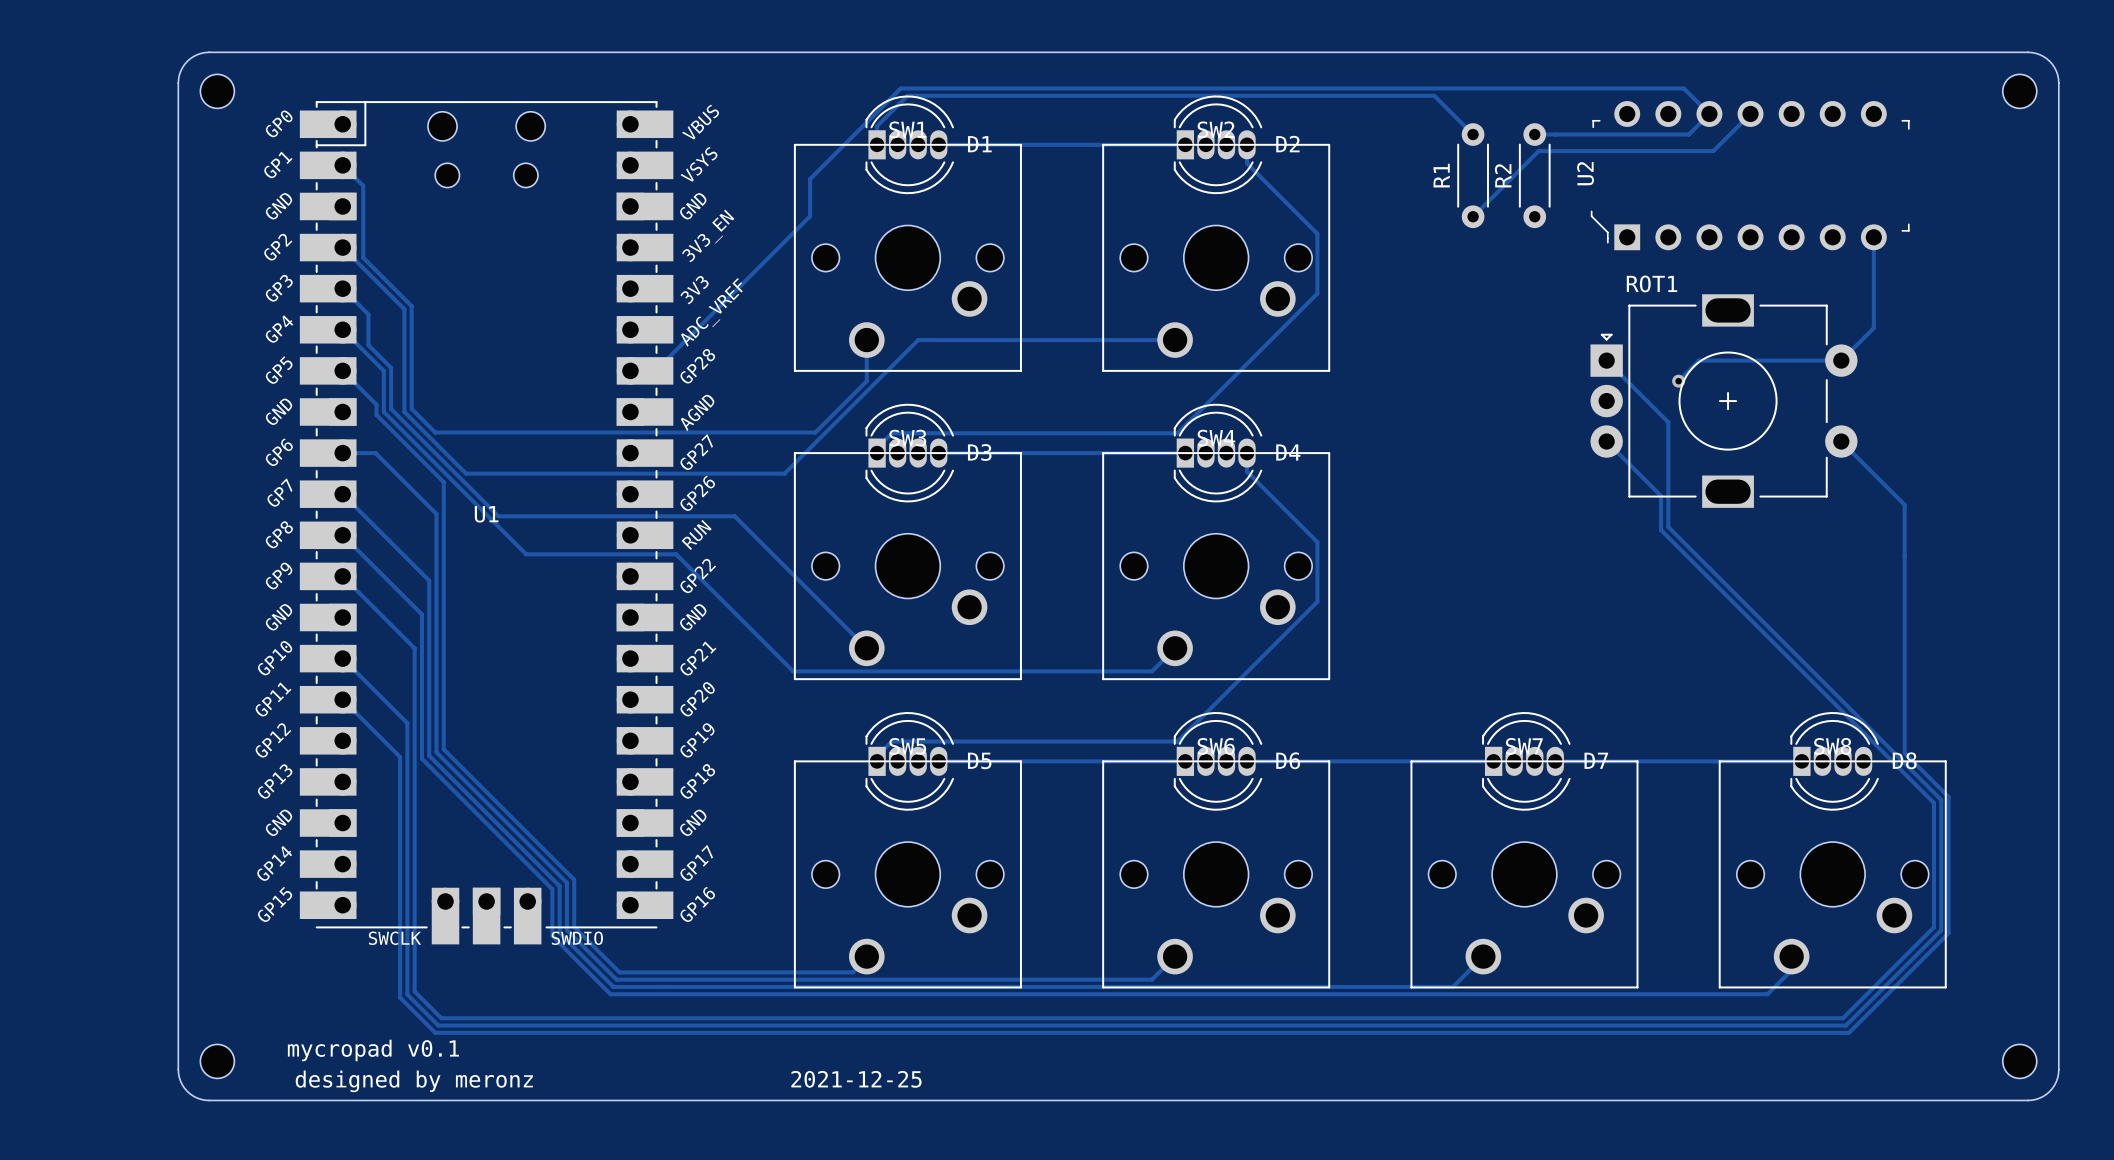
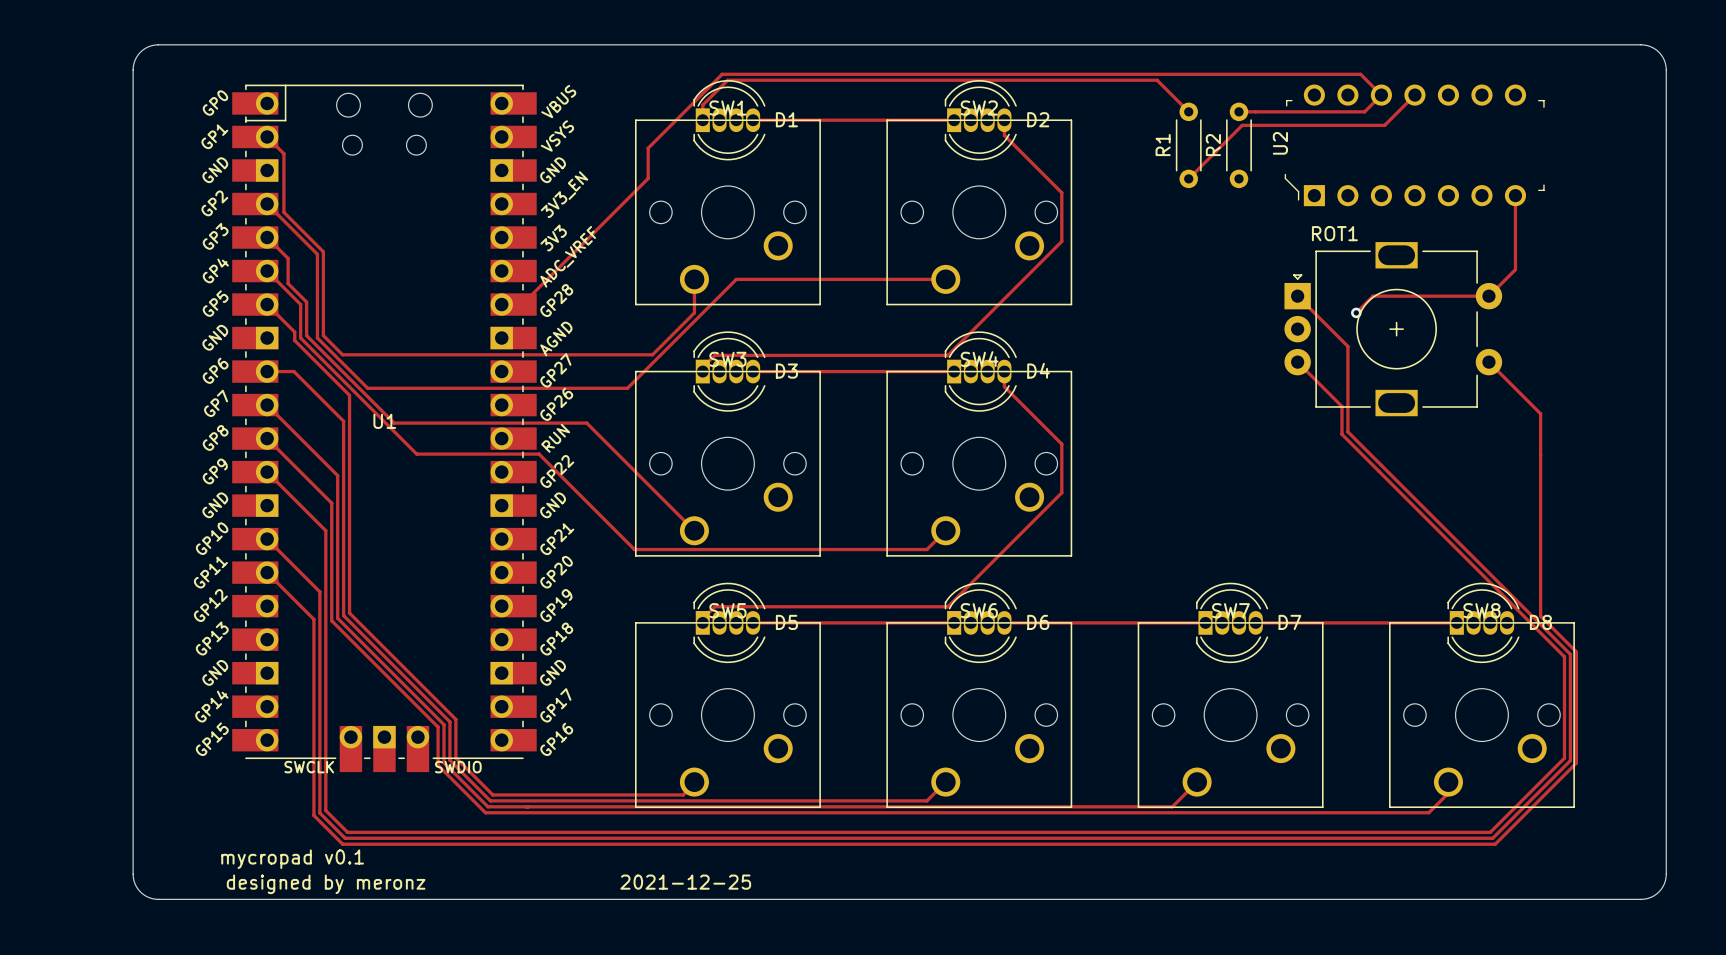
part: (217, 91) -> none
part: (2019, 91) -> none
part: (217, 1061) -> none
part: (2019, 1061) -> none

